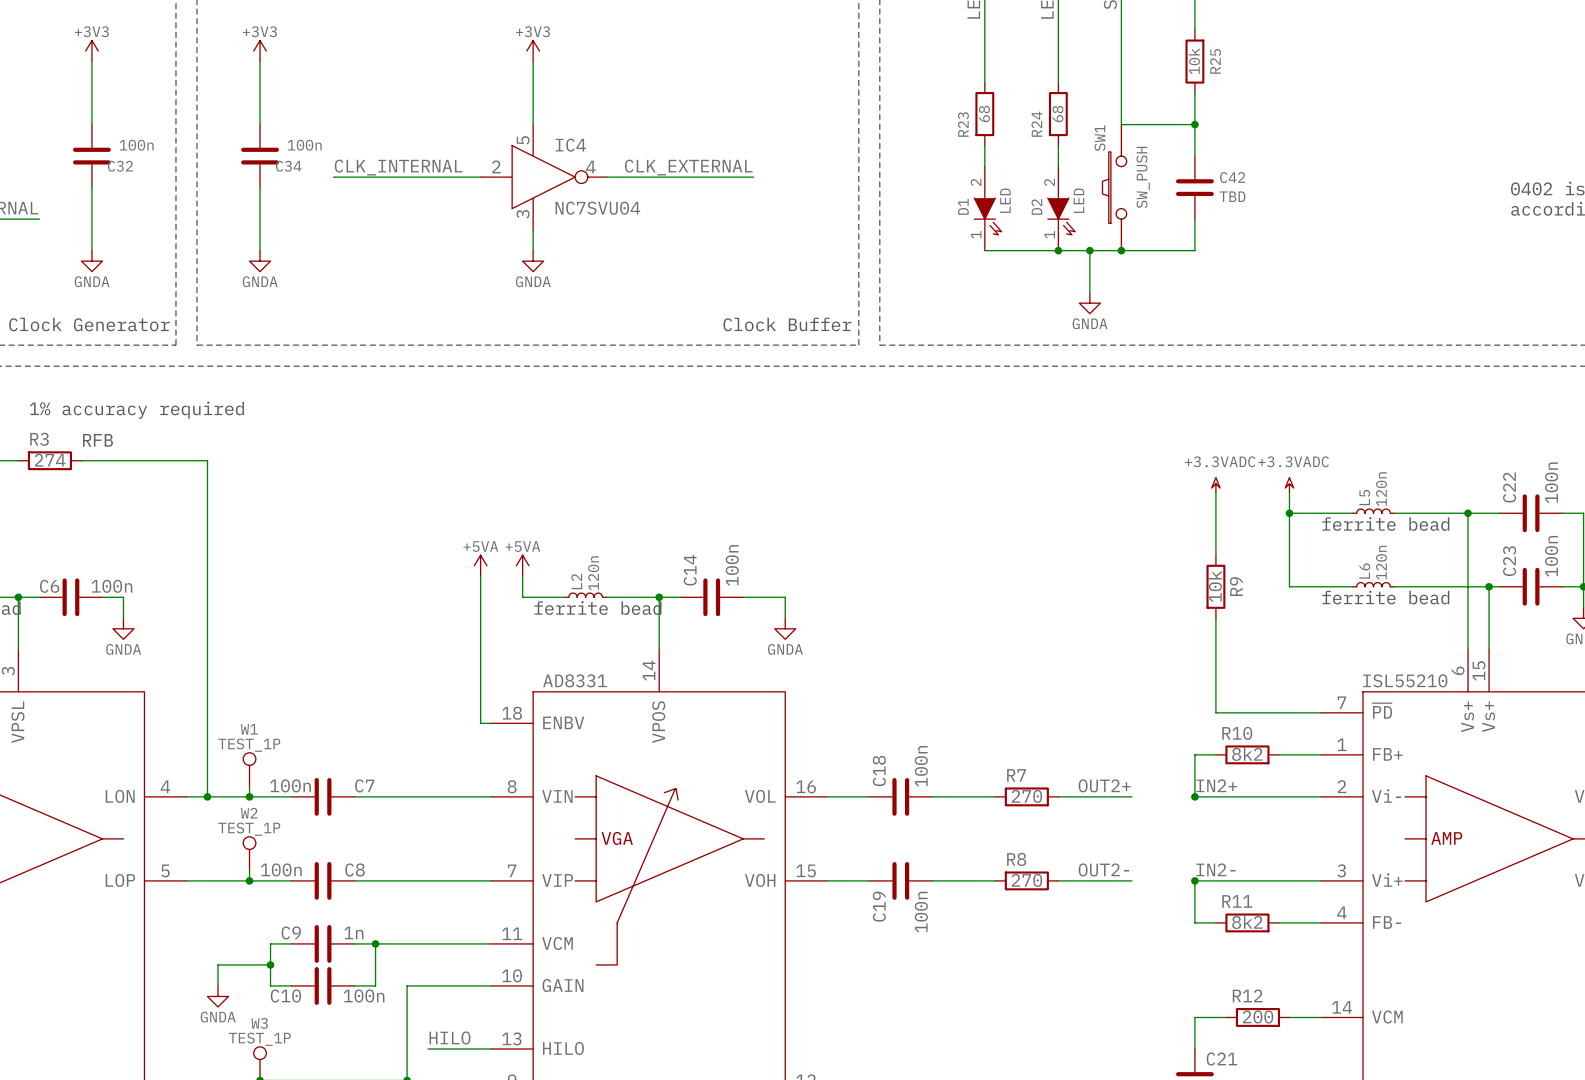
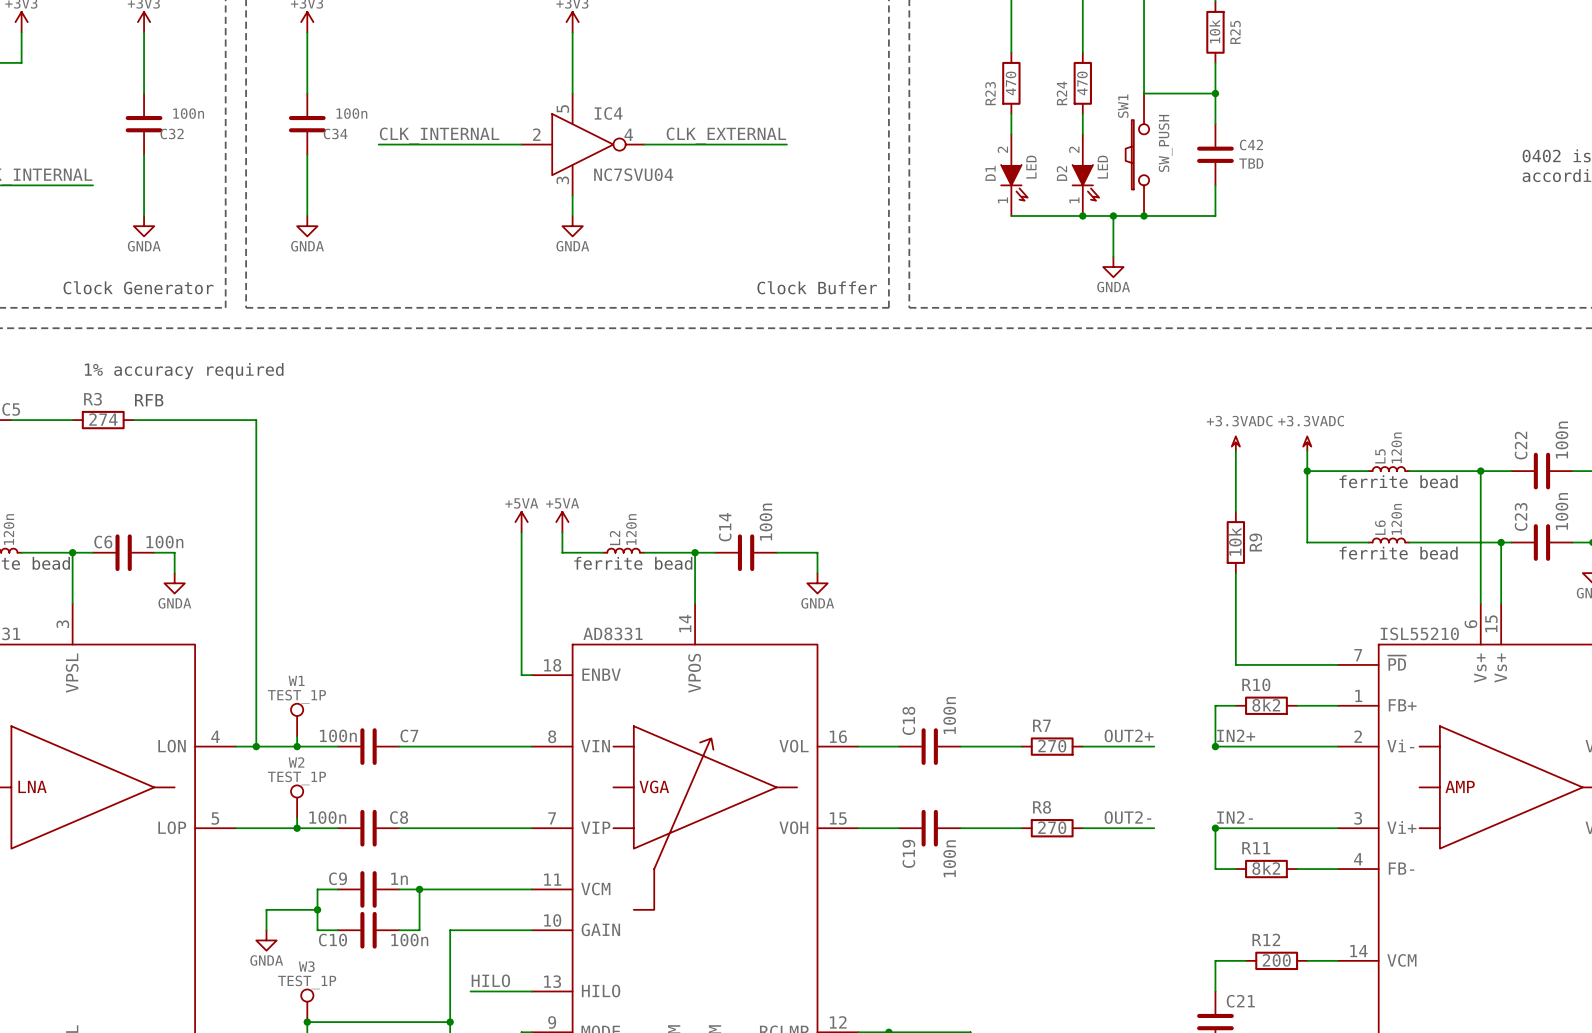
R23 value: 68 (984, 114) -> 470 (1010, 83)
R24 value: 68 (1057, 114) -> 470 (1082, 83)

